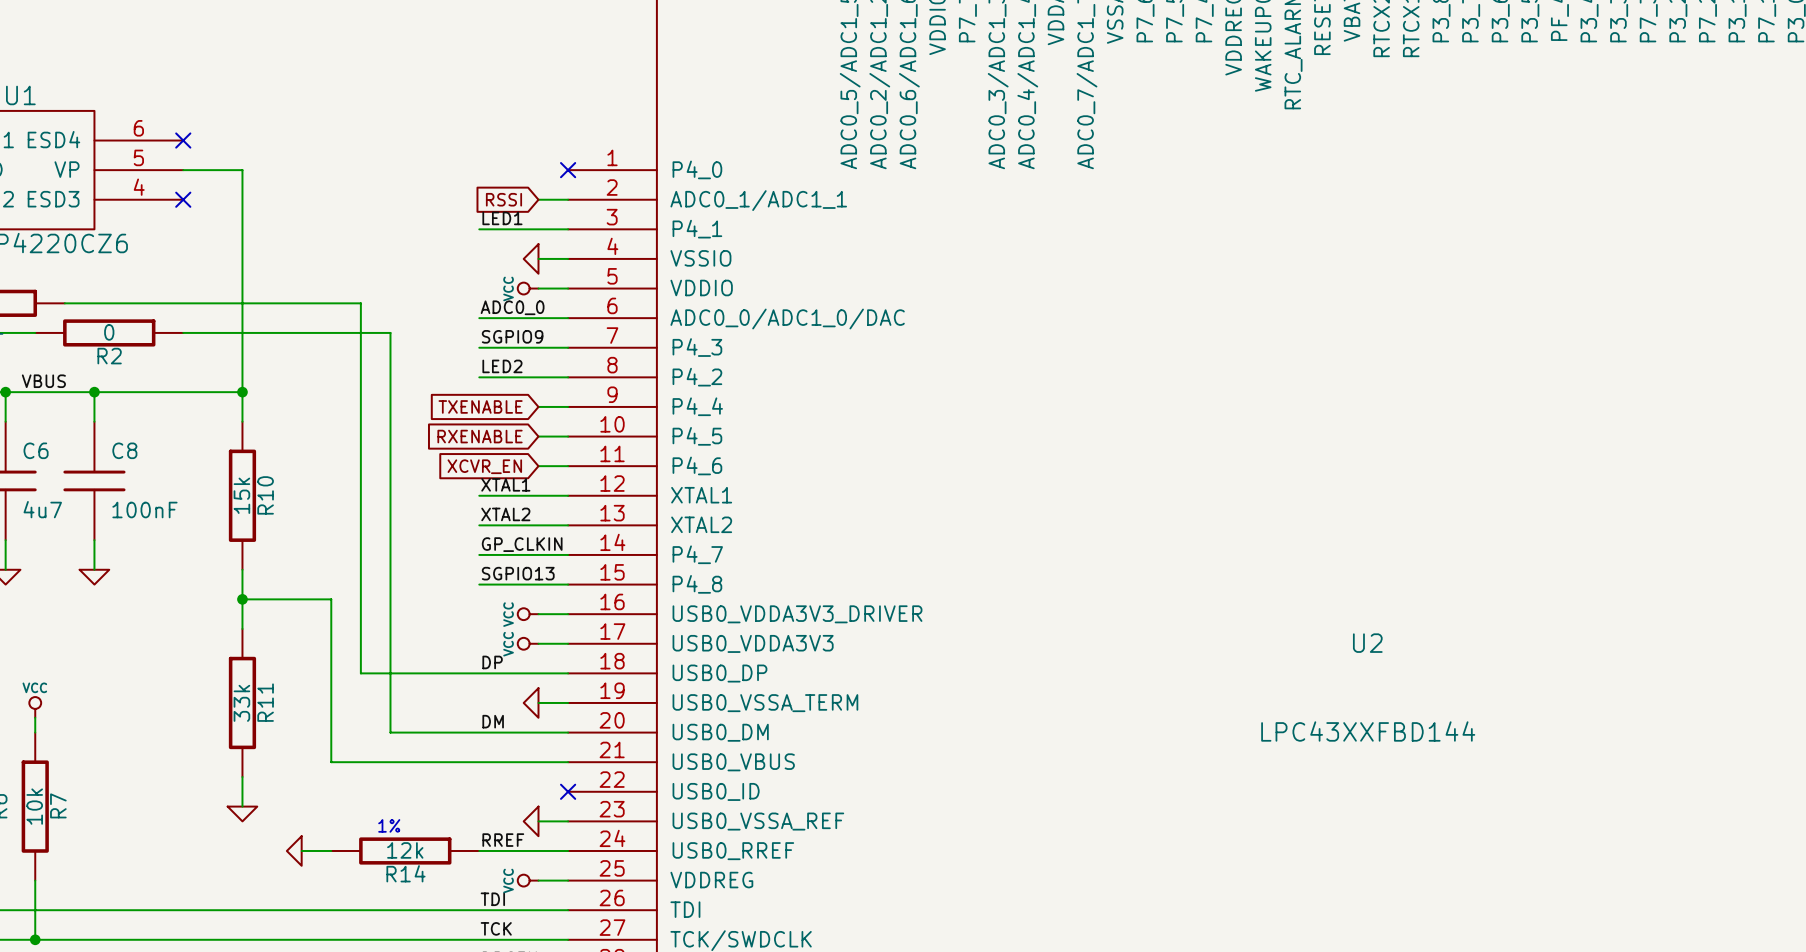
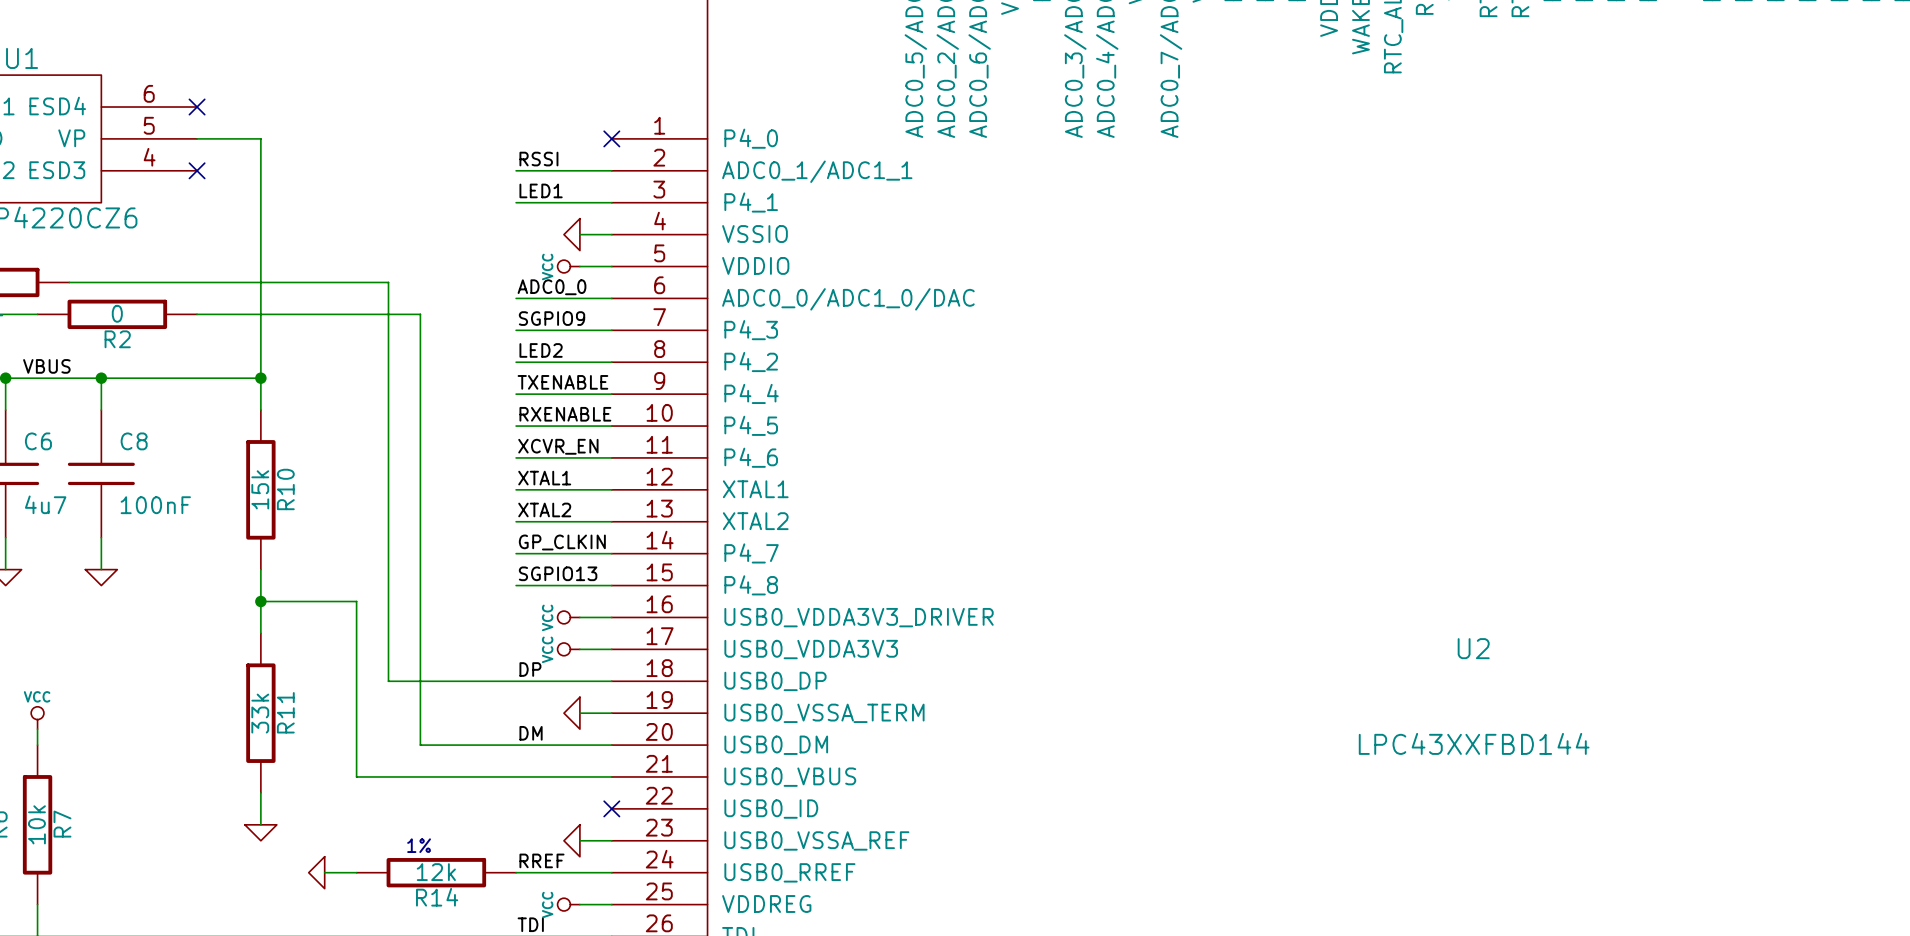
label: none -> RSSI (538, 159)
wire: none -> (516, 170) (579, 170)
global label: RSSI (503, 199) -> none
label: none -> TXENABLE (562, 382)
wire: none -> (516, 394) (579, 394)
global label: TXENABLE (480, 406) -> none
label: none -> RXENABLE (565, 414)
wire: none -> (516, 426) (579, 426)
global label: RXENABLE (480, 436) -> none
label: none -> XCVR_EN (558, 446)
wire: none -> (516, 457) (579, 457)
global label: XCVR_EN (484, 466) -> none

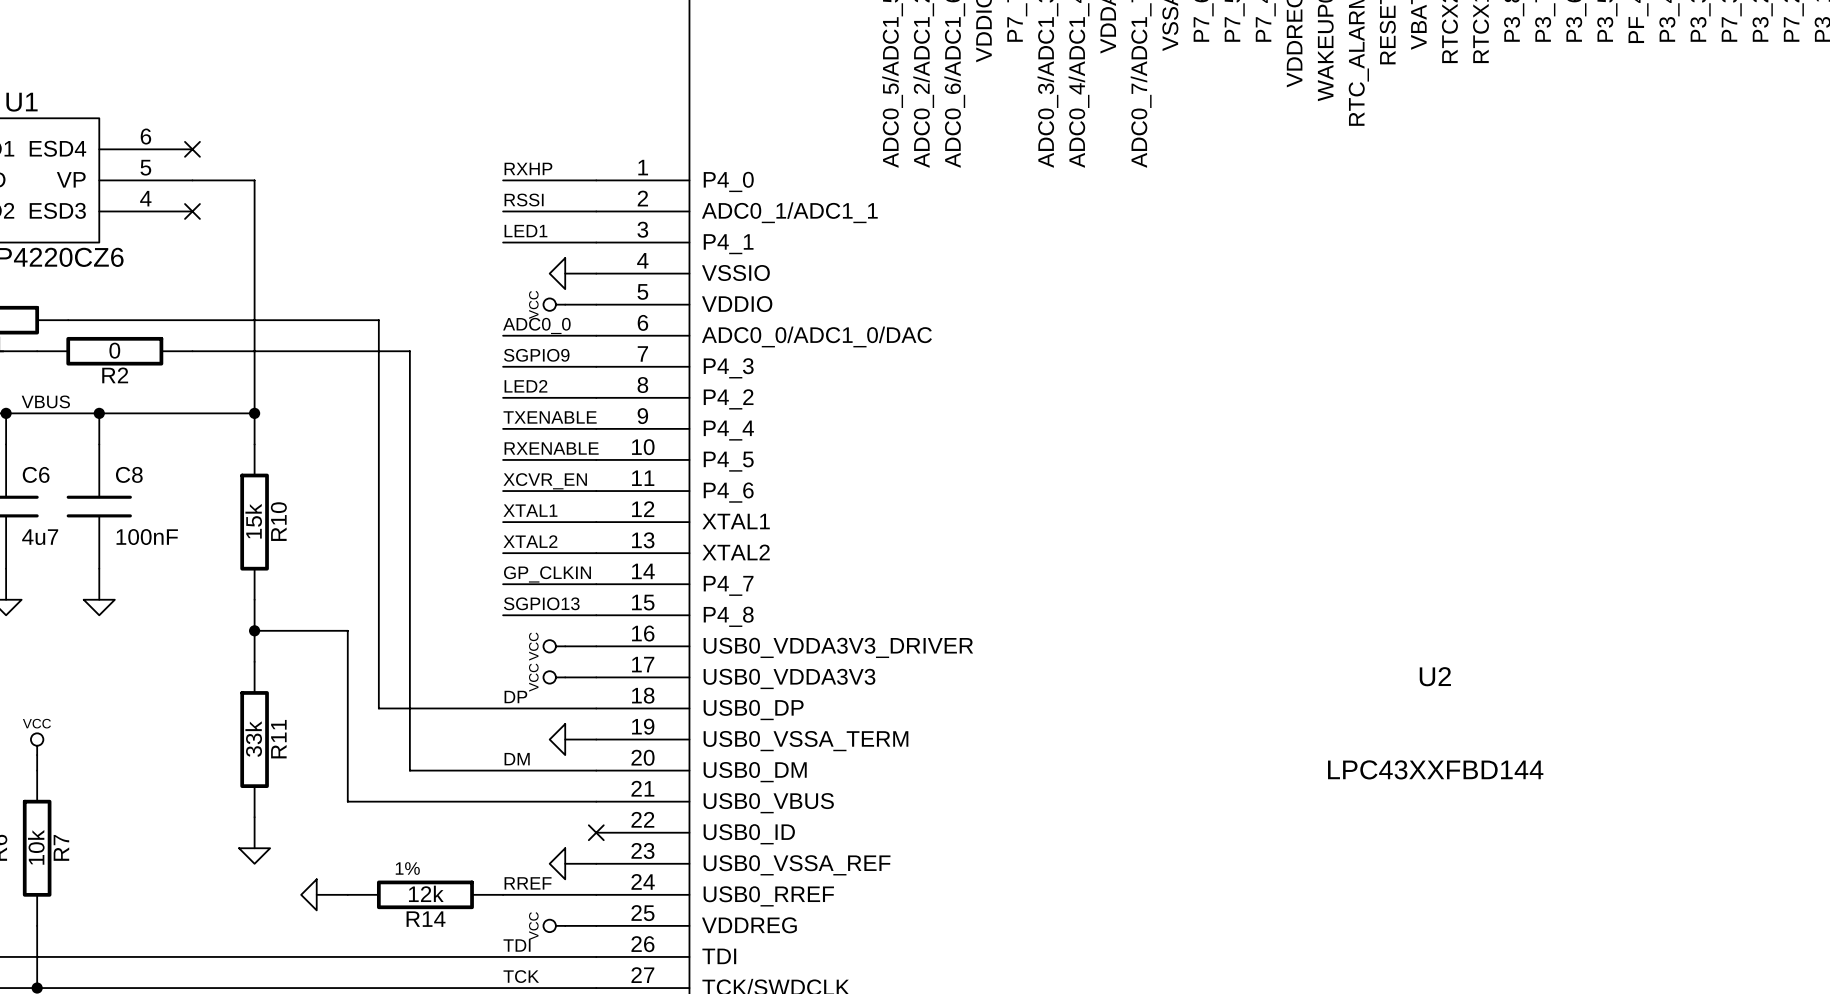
label: none -> RXHP (528, 168)
wire: none -> (503, 180) (596, 180)
no-connect mark: (611, 138) -> none

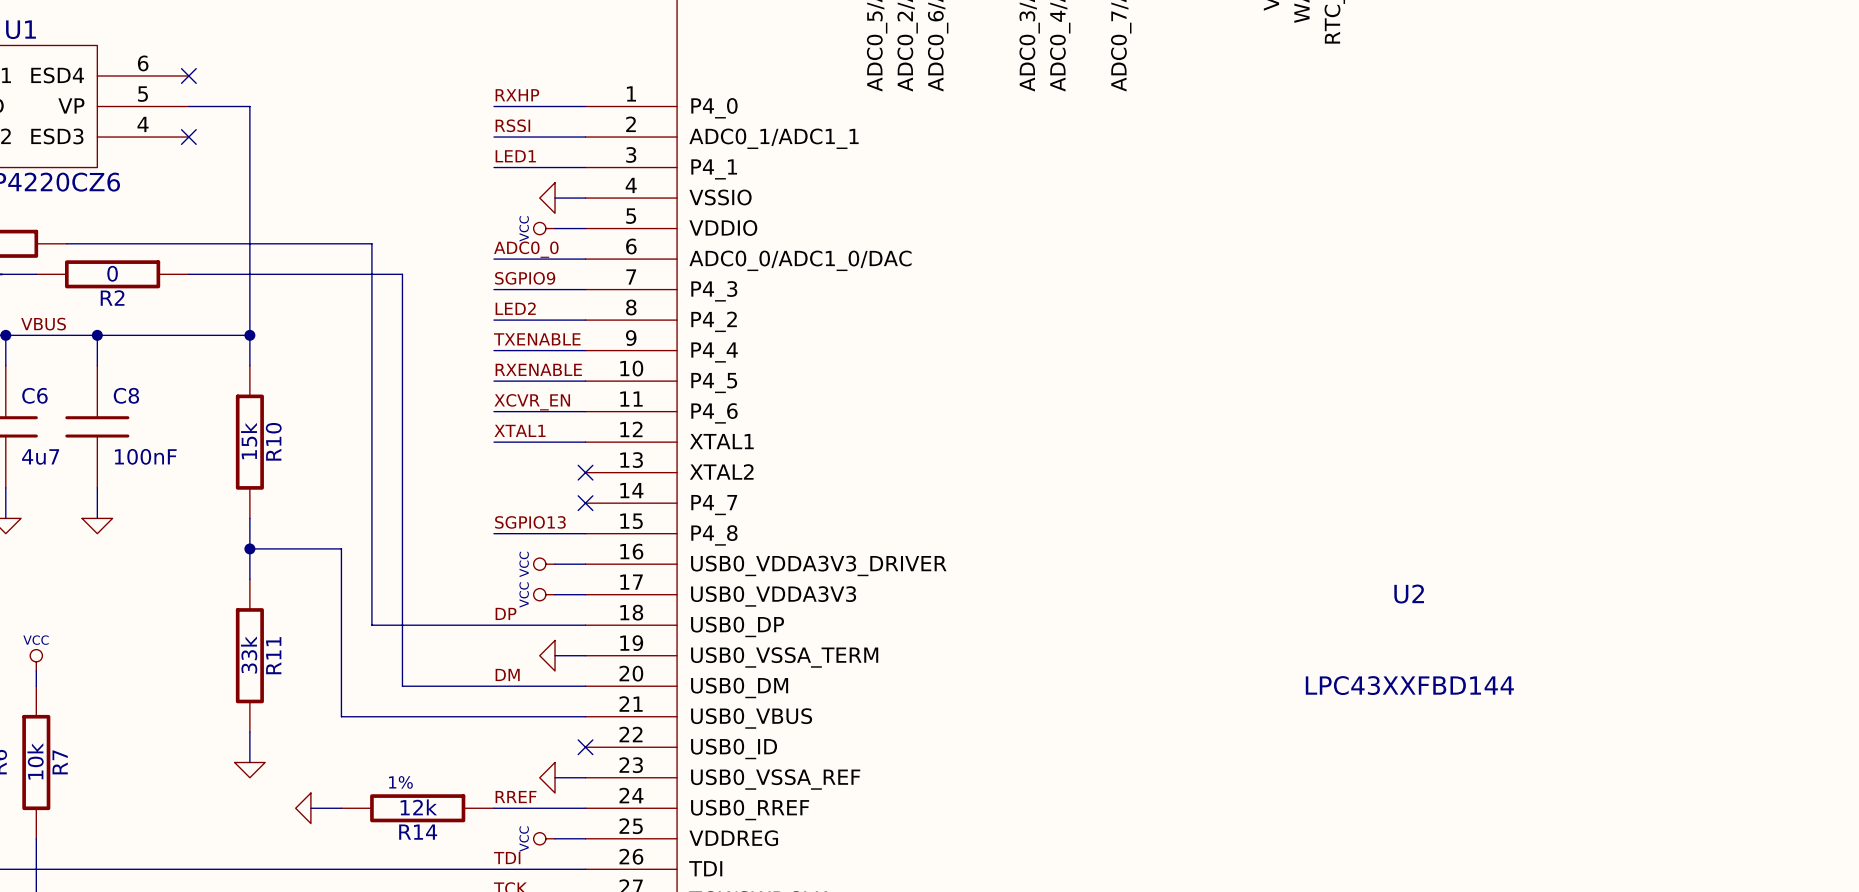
label: XTAL2 (530, 541) -> none
wire: (503, 553) (596, 553) -> none
no-connect mark: none -> (585, 472)
label: GP_CLKIN (547, 574) -> none
wire: (503, 584) (596, 584) -> none
no-connect mark: none -> (585, 503)

